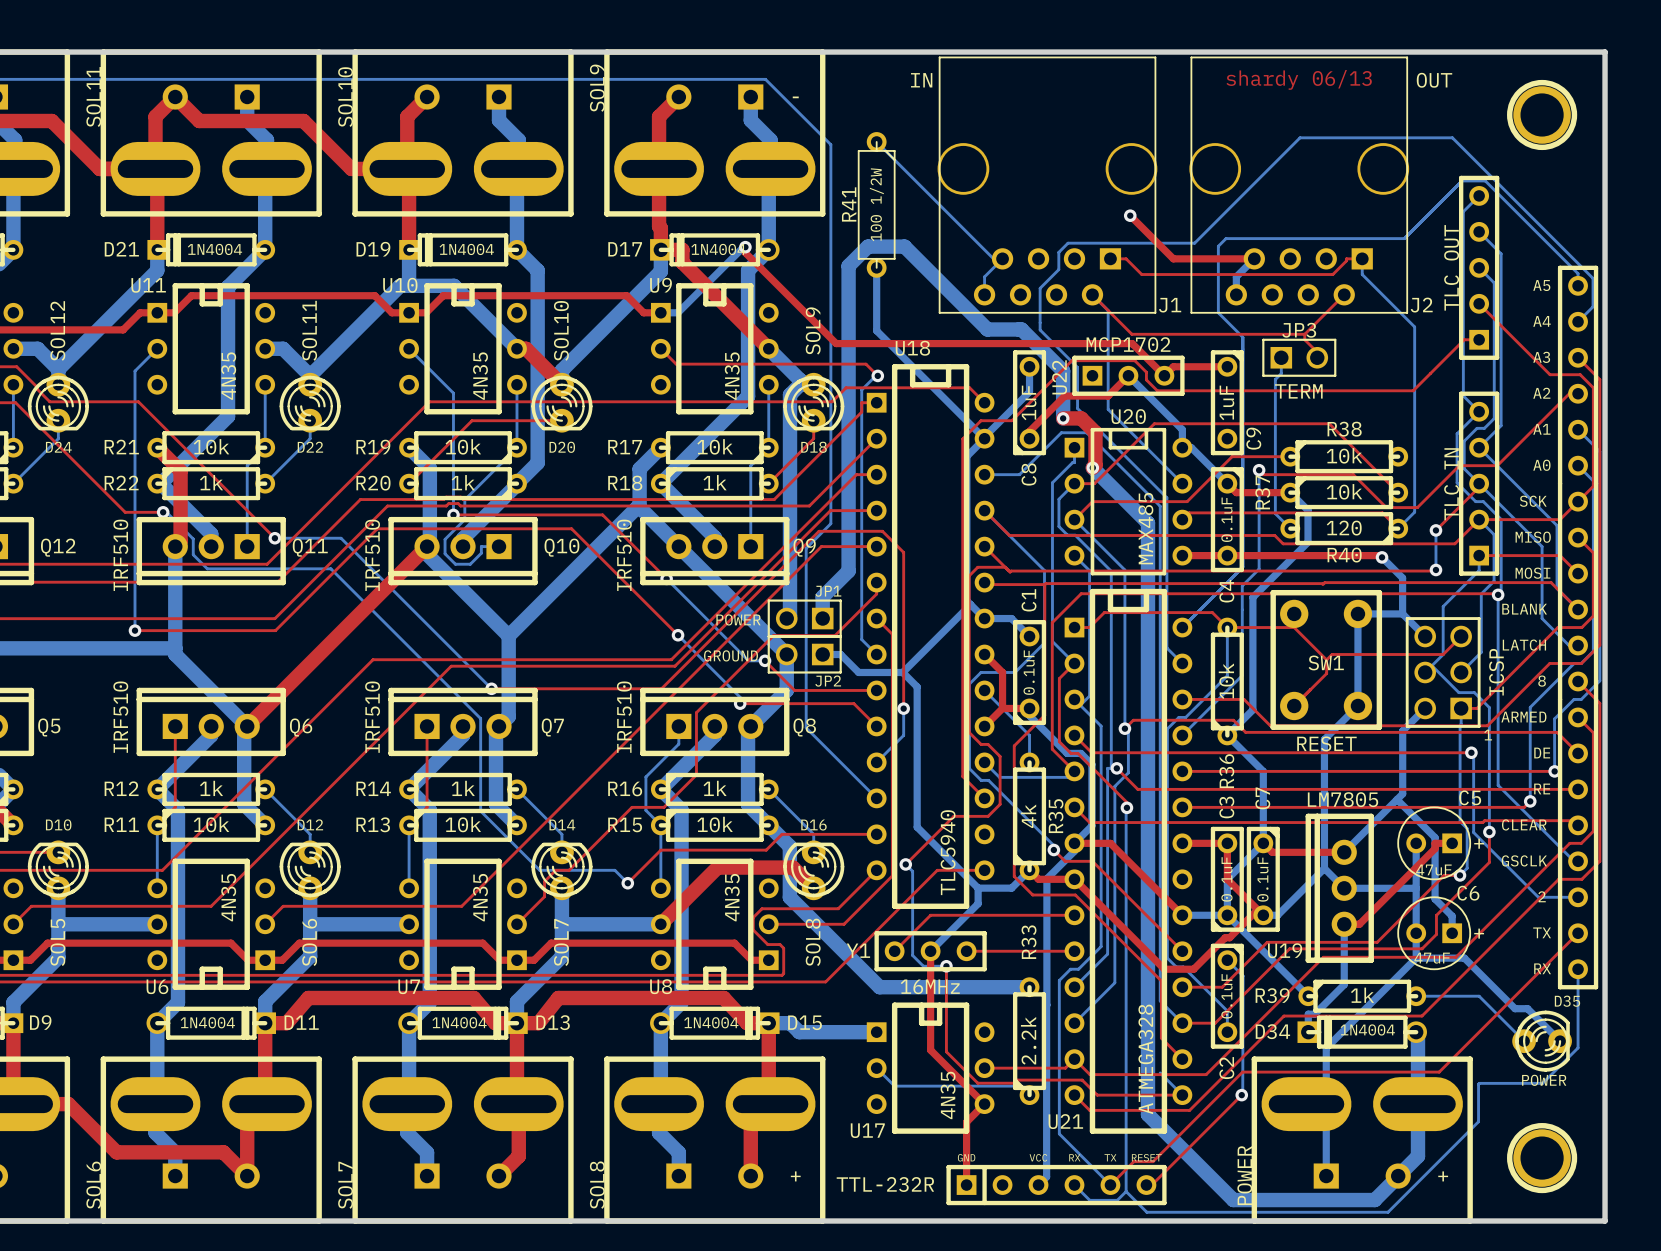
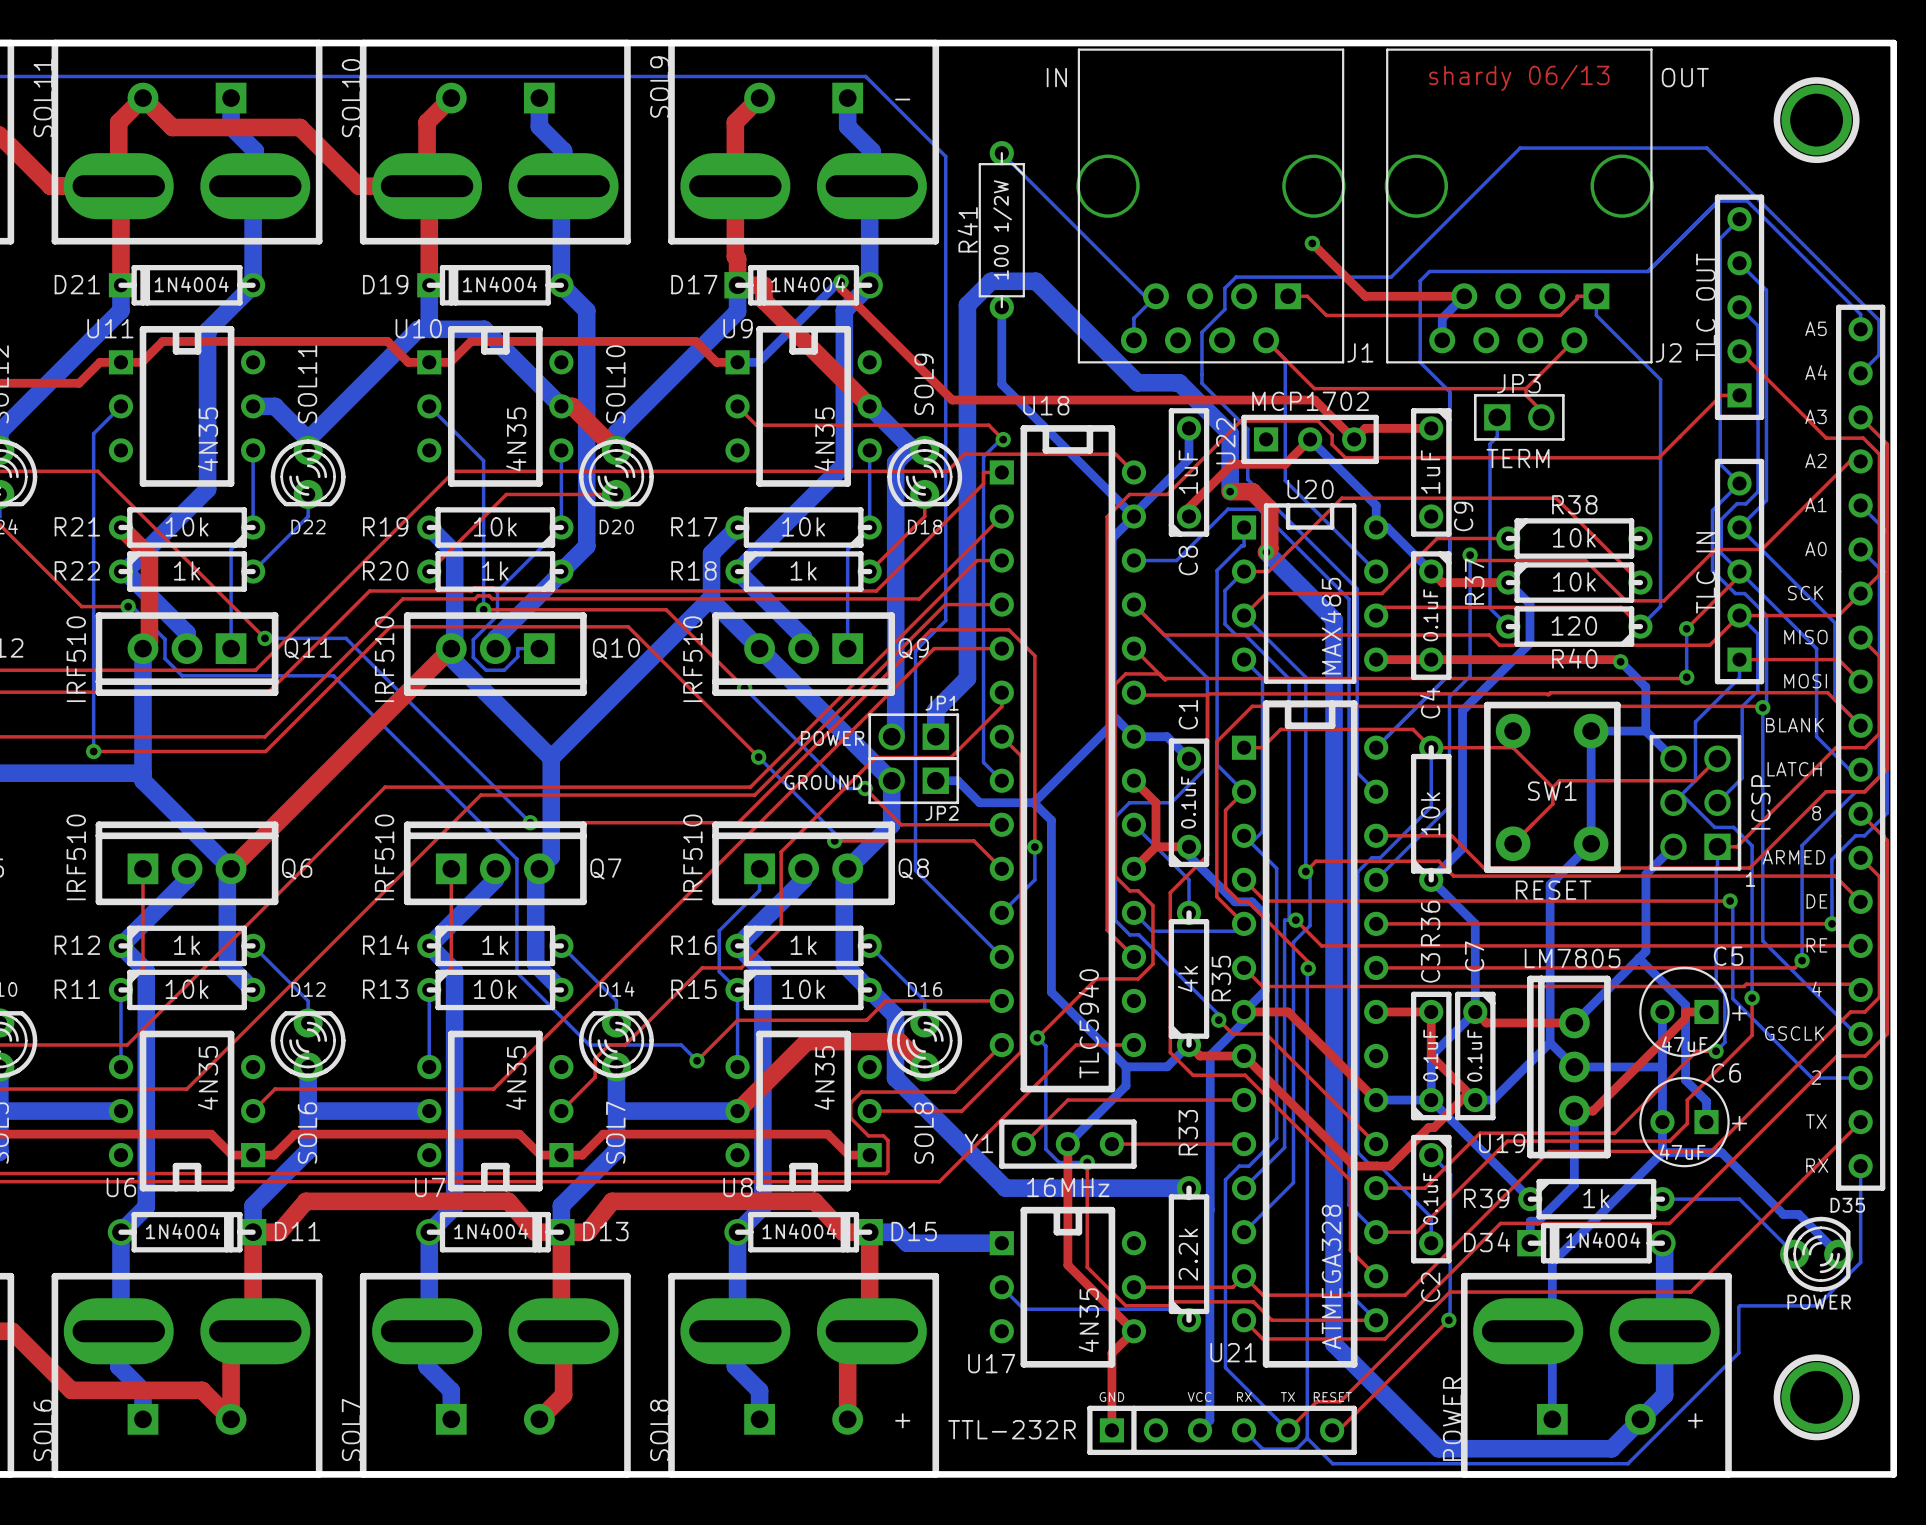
text: CLEAR (1524, 824) -> none
text: none -> 4 (1816, 989)

